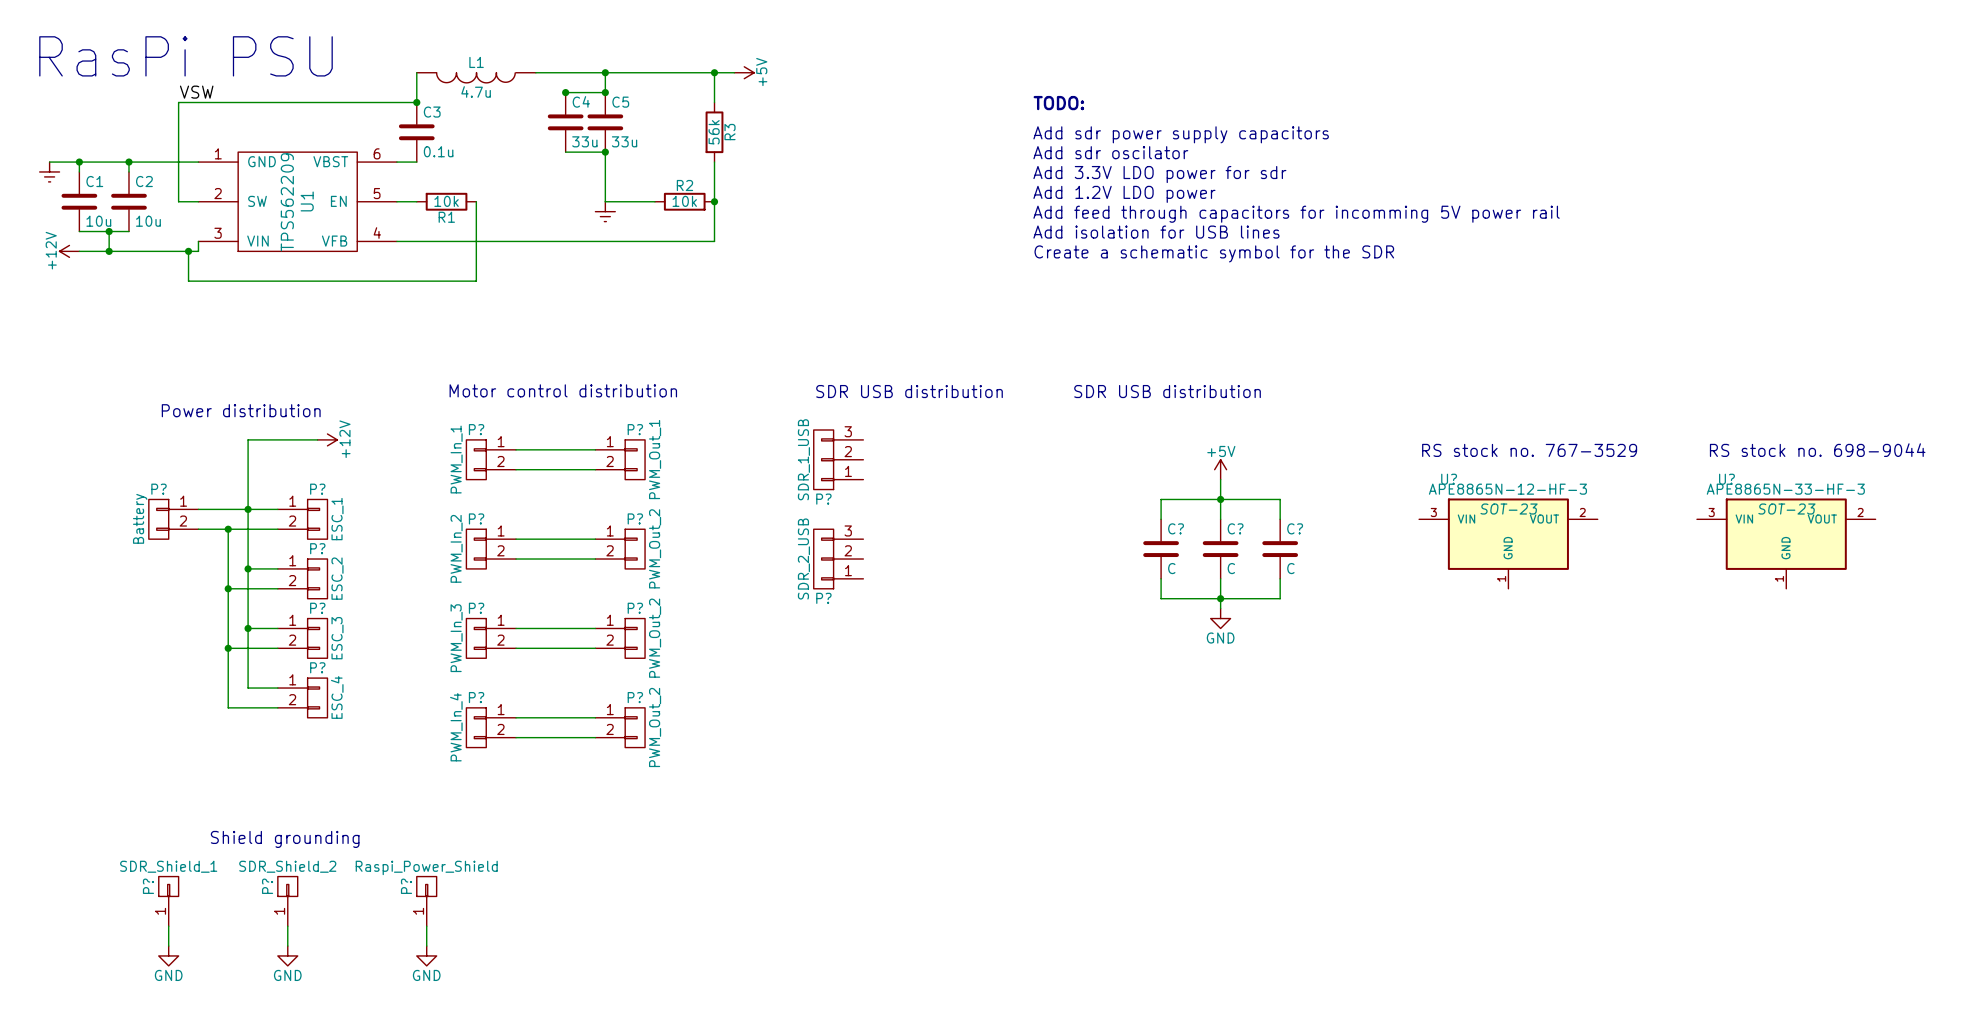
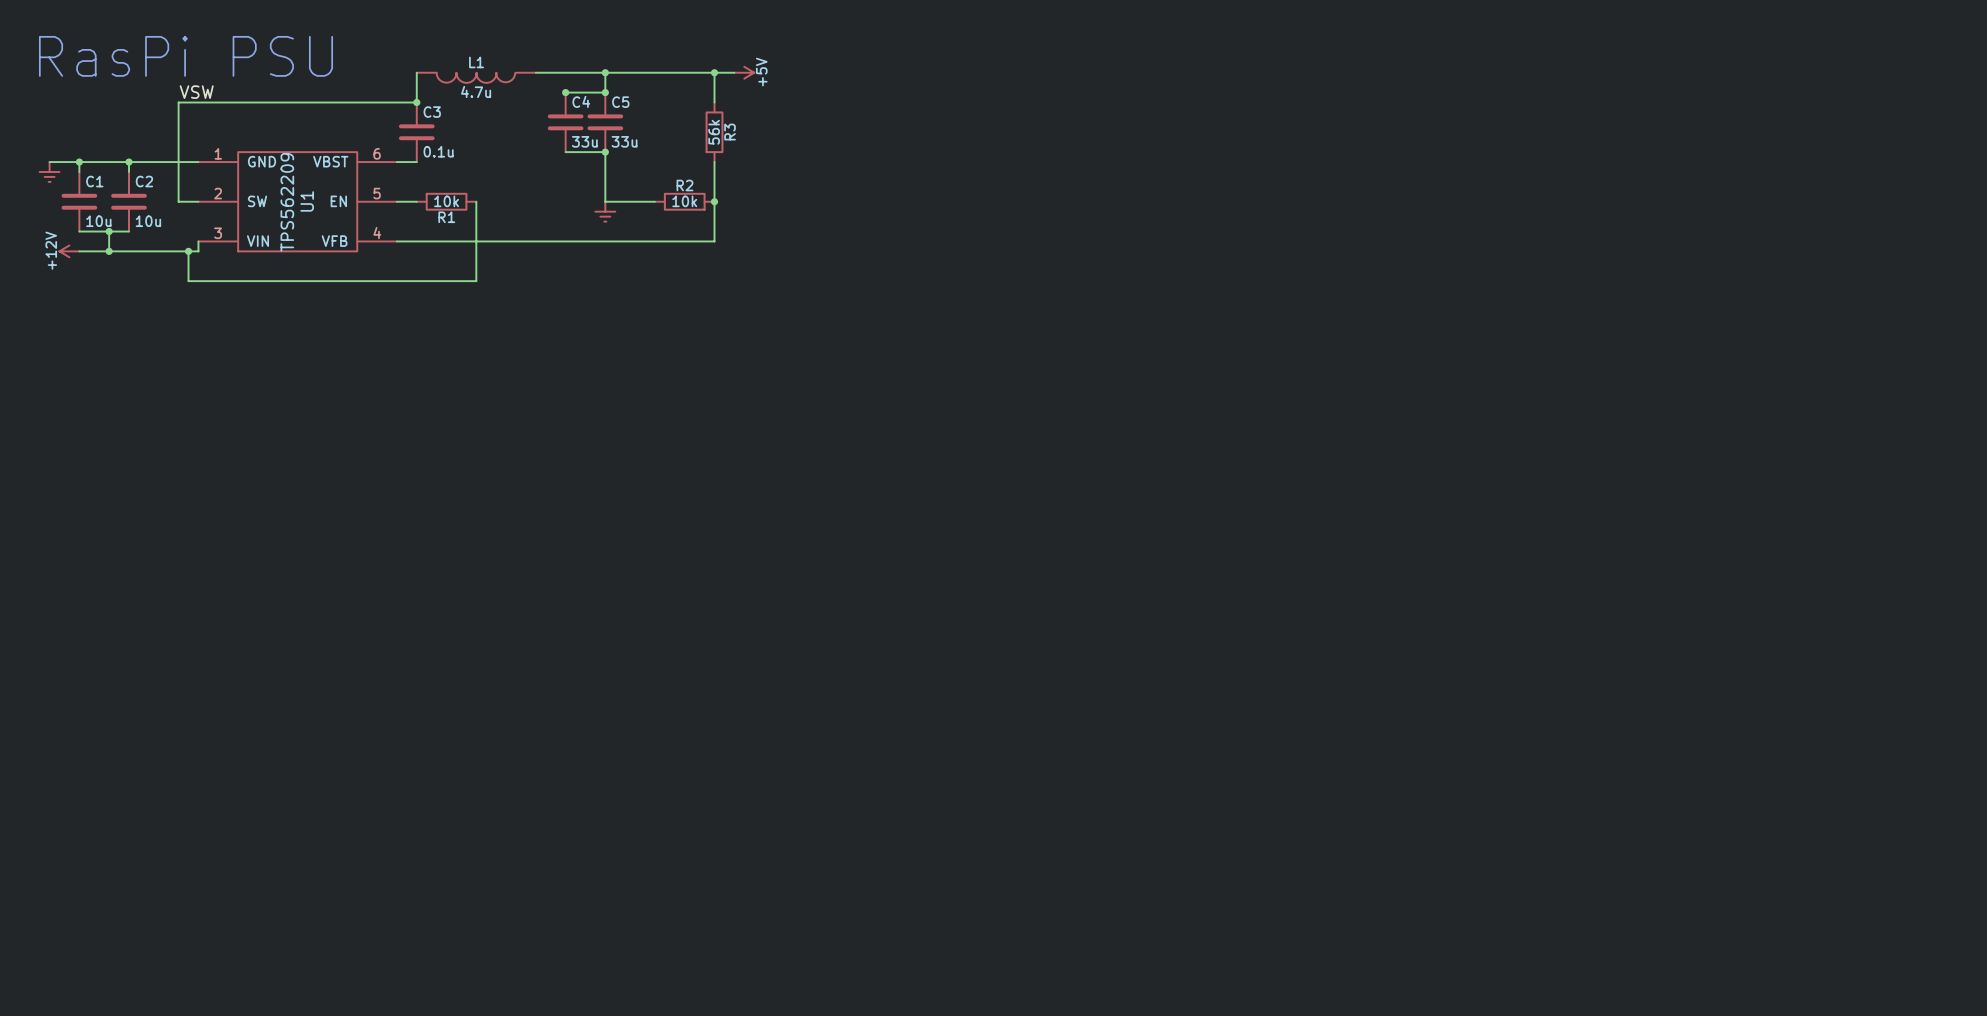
text: TODO: (1058, 103) -> none
text: Add sdr power supply capacitors (1181, 134) -> none
text: Add sdr oscilator (1110, 152) -> none
text: Add 3.3V LDO power for sdr (1159, 174) -> none
text: Add 1.2V LDO power (1124, 194) -> none
text: Add feed through capacitors for incomming 5V power rail (1296, 214) -> none
text: Add isolation for USB lines (1156, 232) -> none
text: Create a schematic symbol for the SDR (1214, 253) -> none
text: Motor control distribution (563, 390) -> none
text: SDR USB distribution (909, 391) -> none
text: SDR USB distribution (1167, 391) -> none
text: Power distribution (241, 410) -> none
wire: (317, 439) (248, 439) (248, 688) (277, 688) -> none
power symbol: +12V (327, 439) -> none
wire: (516, 449) (595, 449) -> none
text: RS stock no. 767-3529 (1529, 450) -> none
text: RS stock no. 698-9044 (1817, 450) -> none
P?: PWM_In_1 (491, 459) -> none
P?: PWM_Out_1 (620, 459) -> none
P?: SDR_1_USB (838, 459) -> none
wire: (516, 469) (595, 469) -> none
power symbol: +5V (1220, 469) -> none
wire: (1220, 479) (1220, 519) -> none
junction: (1220, 499) -> none
wire: (198, 509) (277, 509) -> none
junction: (248, 509) -> none
P?: Battery (173, 519) -> none
P?: ESC_1 (302, 519) -> none
wire: (1161, 519) (1161, 499) (1280, 499) (1280, 519) -> none
wire: (198, 529) (277, 529) -> none
wire: (228, 529) (228, 707) (277, 707) -> none
junction: (228, 529) -> none
wire: (516, 539) (595, 539) -> none
U?: APE8865N-12-HF-3 (1508, 543) -> none
U?: APE8865N-33-HF-3 (1786, 543) -> none
P?: PWM_In_2 (491, 549) -> none
P?: PWM_Out_2 (620, 549) -> none
C?: C (1161, 549) -> none
C?: C (1220, 549) -> none
C?: C (1280, 549) -> none
wire: (516, 559) (595, 559) -> none
P?: SDR_2_USB (838, 559) -> none
wire: (248, 568) (277, 568) -> none
junction: (248, 568) -> none
P?: ESC_2 (302, 578) -> none
wire: (1161, 578) (1161, 598) (1280, 598) (1280, 578) -> none
wire: (1220, 578) (1220, 608) -> none
wire: (228, 588) (277, 588) -> none
junction: (228, 588) -> none
junction: (1220, 598) -> none
power symbol: GND (1220, 618) -> none
wire: (248, 628) (277, 628) -> none
junction: (248, 628) -> none
wire: (516, 628) (595, 628) -> none
P?: ESC_3 (302, 638) -> none
P?: PWM_In_3 (491, 638) -> none
P?: PWM_Out_2 (620, 638) -> none
wire: (228, 648) (277, 648) -> none
junction: (228, 648) -> none
wire: (516, 648) (595, 648) -> none
P?: ESC_4 (302, 697) -> none
wire: (516, 717) (595, 717) -> none
P?: PWM_In_4 (491, 727) -> none
P?: PWM_Out_2 (620, 727) -> none
wire: (516, 737) (595, 737) -> none
text: Shield grounding (285, 839) -> none
P?: SDR_Shield_1 (168, 901) -> none
P?: SDR_Shield_2 (287, 901) -> none
P?: Raspi_Power_Shield (426, 901) -> none
wire: (168, 926) (168, 946) -> none
wire: (287, 926) (287, 946) -> none
wire: (426, 926) (426, 946) -> none
power symbol: GND (168, 955) -> none
power symbol: GND (287, 955) -> none
power symbol: GND (426, 955) -> none

